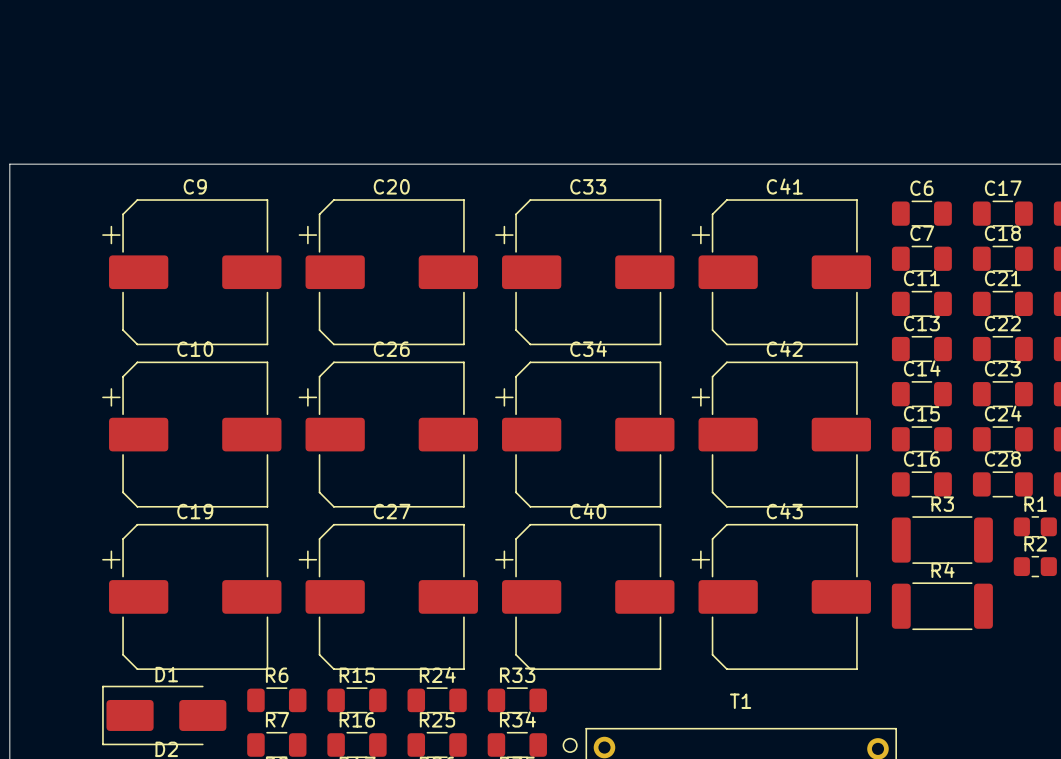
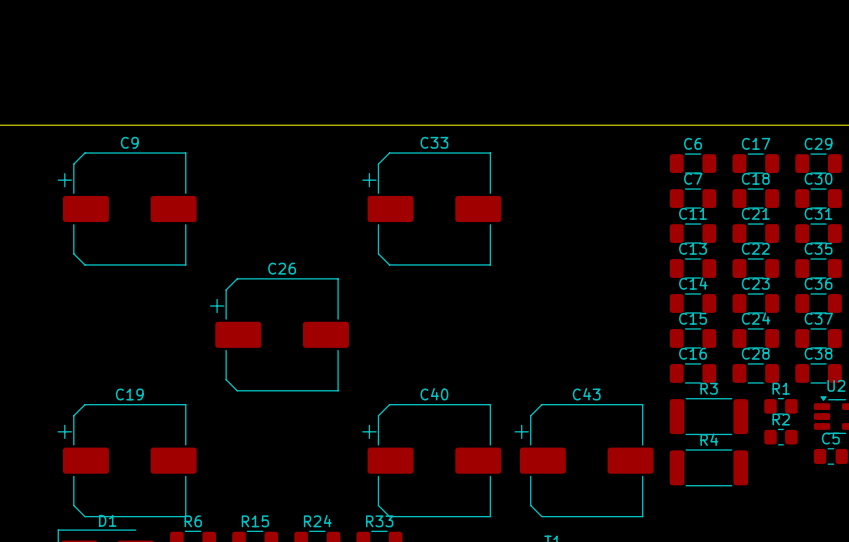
C20: (388, 272) -> none
C41: (781, 272) -> none
C10: (191, 434) -> none
C34: (584, 434) -> none
C42: (781, 434) -> none
C27: (388, 596) -> none

